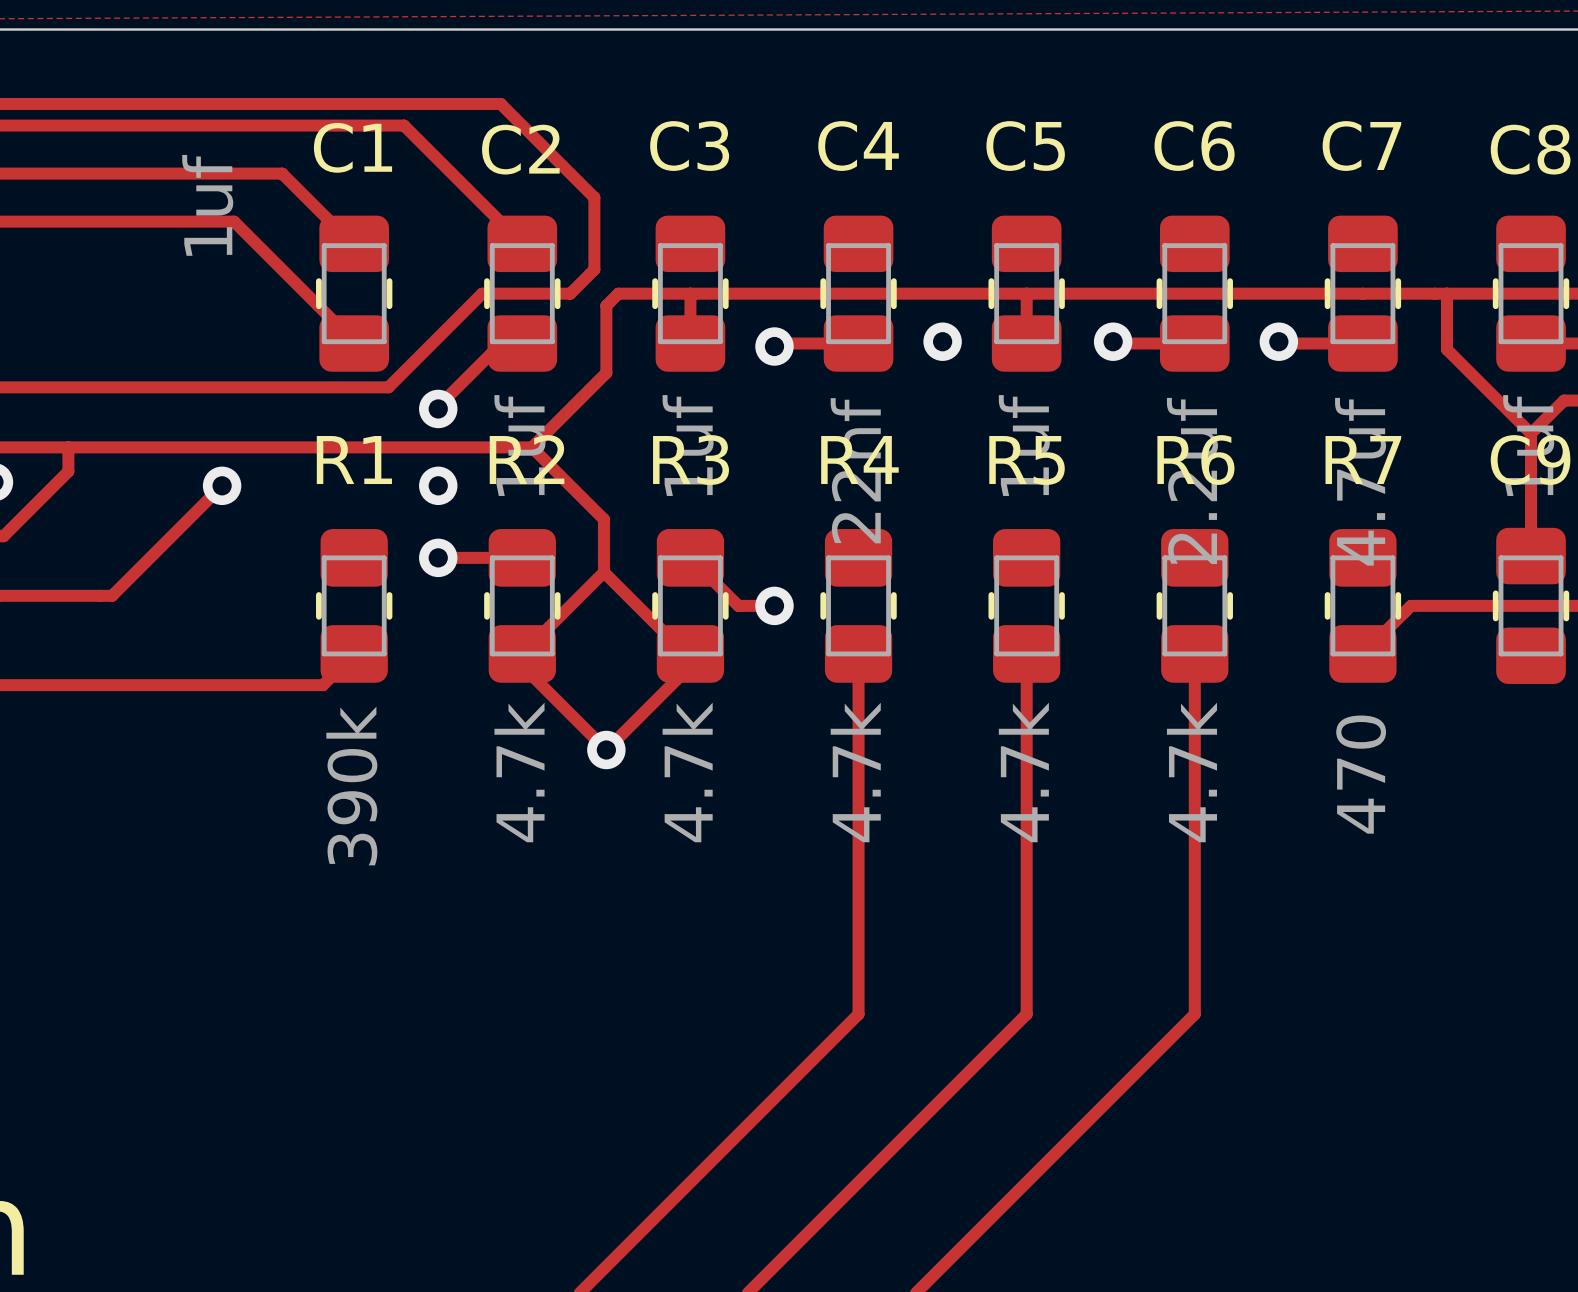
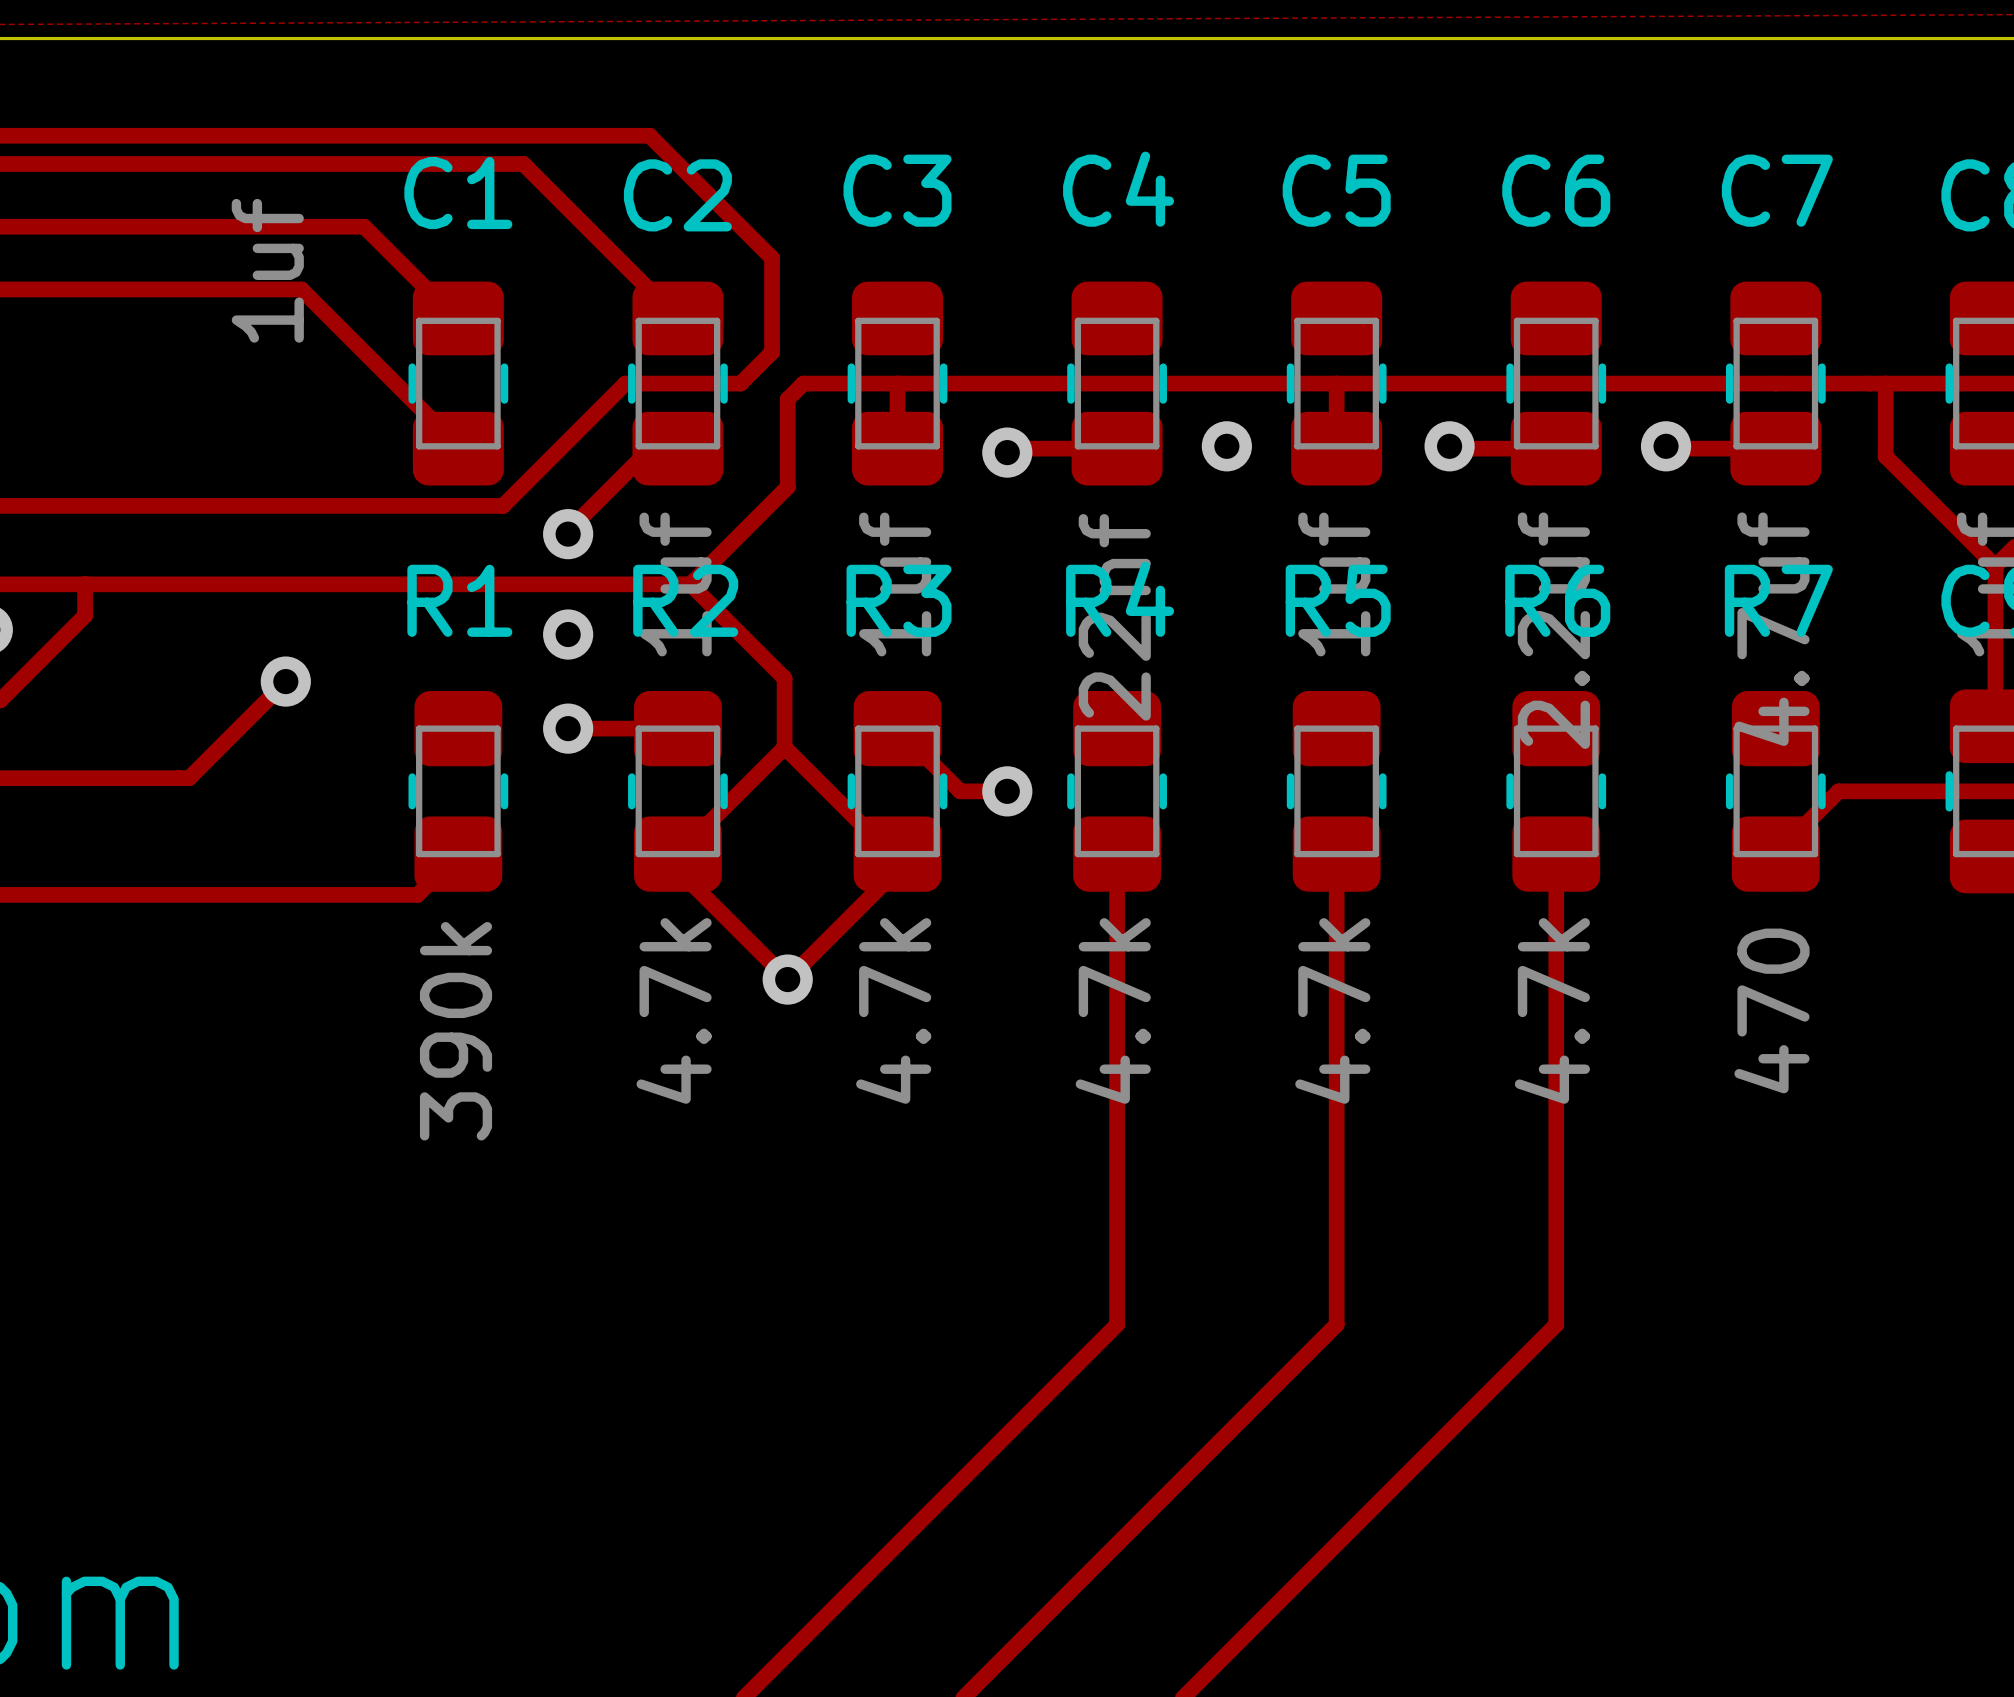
track: (222, 485) (112, 595) -> (285, 681) (189, 778) (142, 778)
via position: (222, 485) -> (285, 681)

